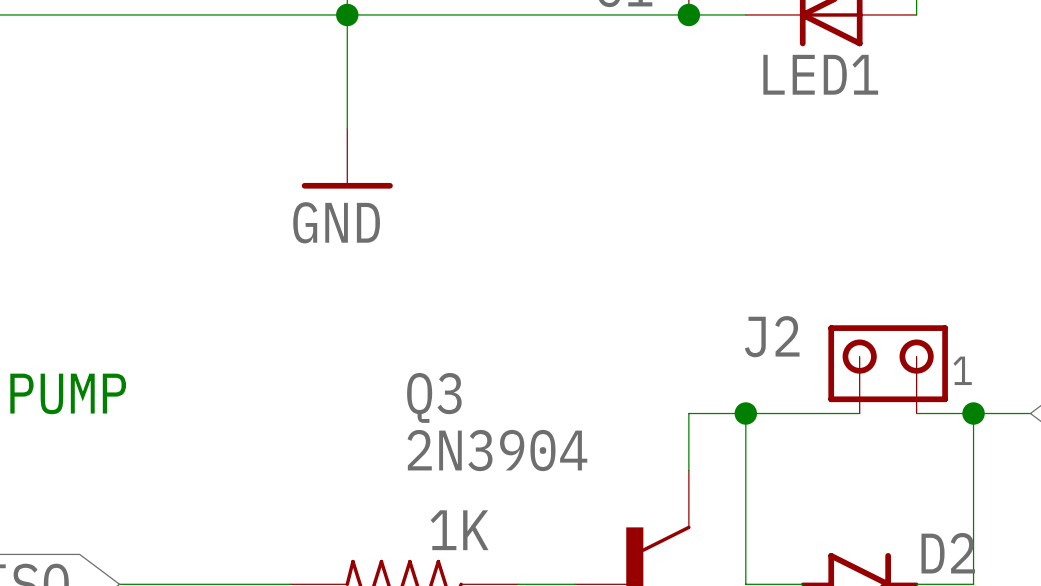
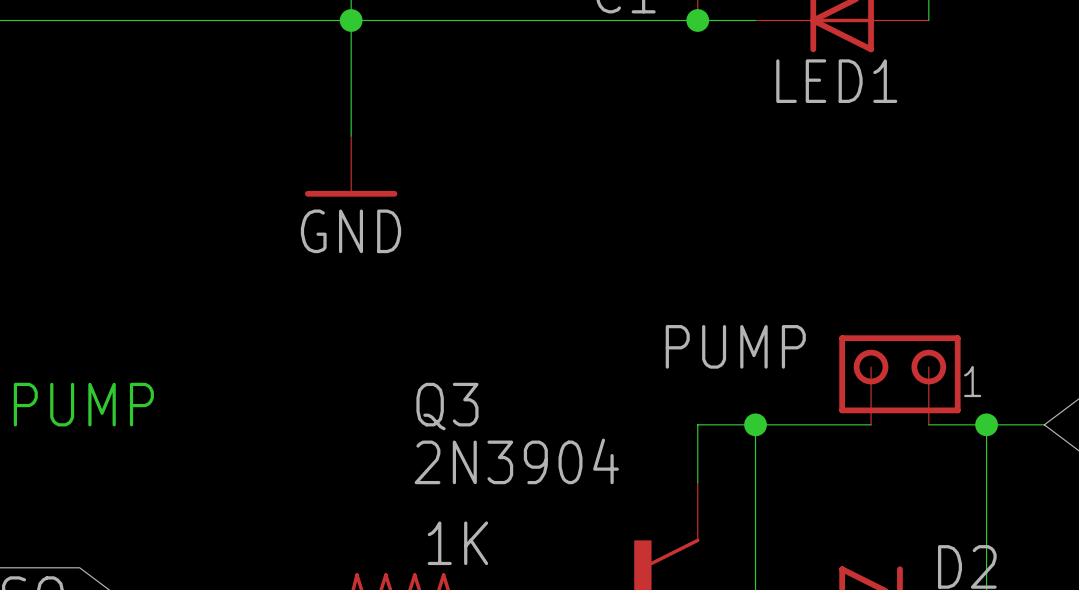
J2 name: J2 (772, 336) -> PUMP (735, 346)

